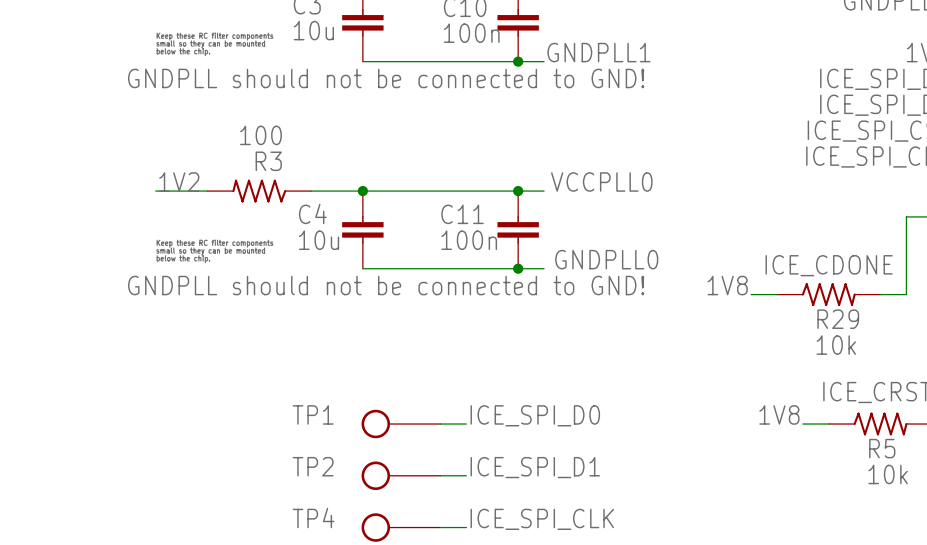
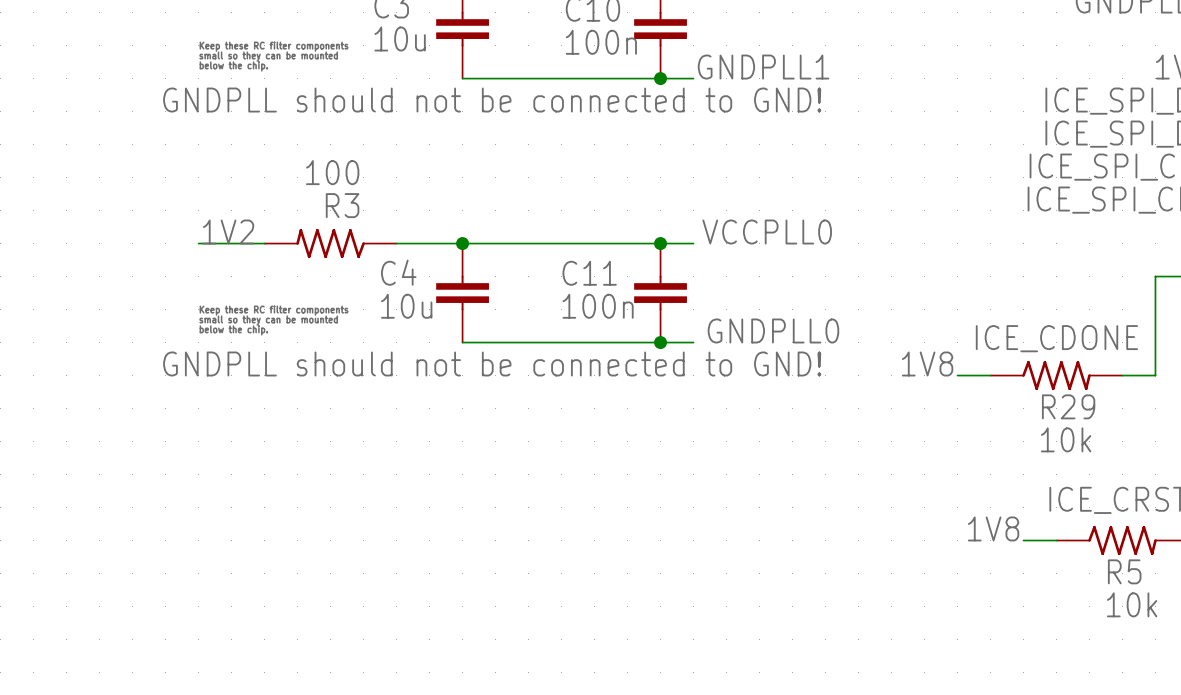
label: ICE_SPI_D0 (535, 415) -> none
TP1: (401, 424) -> none
wire: (440, 424) (466, 424) -> none
label: ICE_SPI_D1 (535, 467) -> none
TP2: (401, 475) -> none
wire: (440, 475) (466, 475) -> none
label: ICE_SPI_CLK (542, 519) -> none
TP4: (401, 527) -> none
wire: (440, 527) (466, 527) -> none

